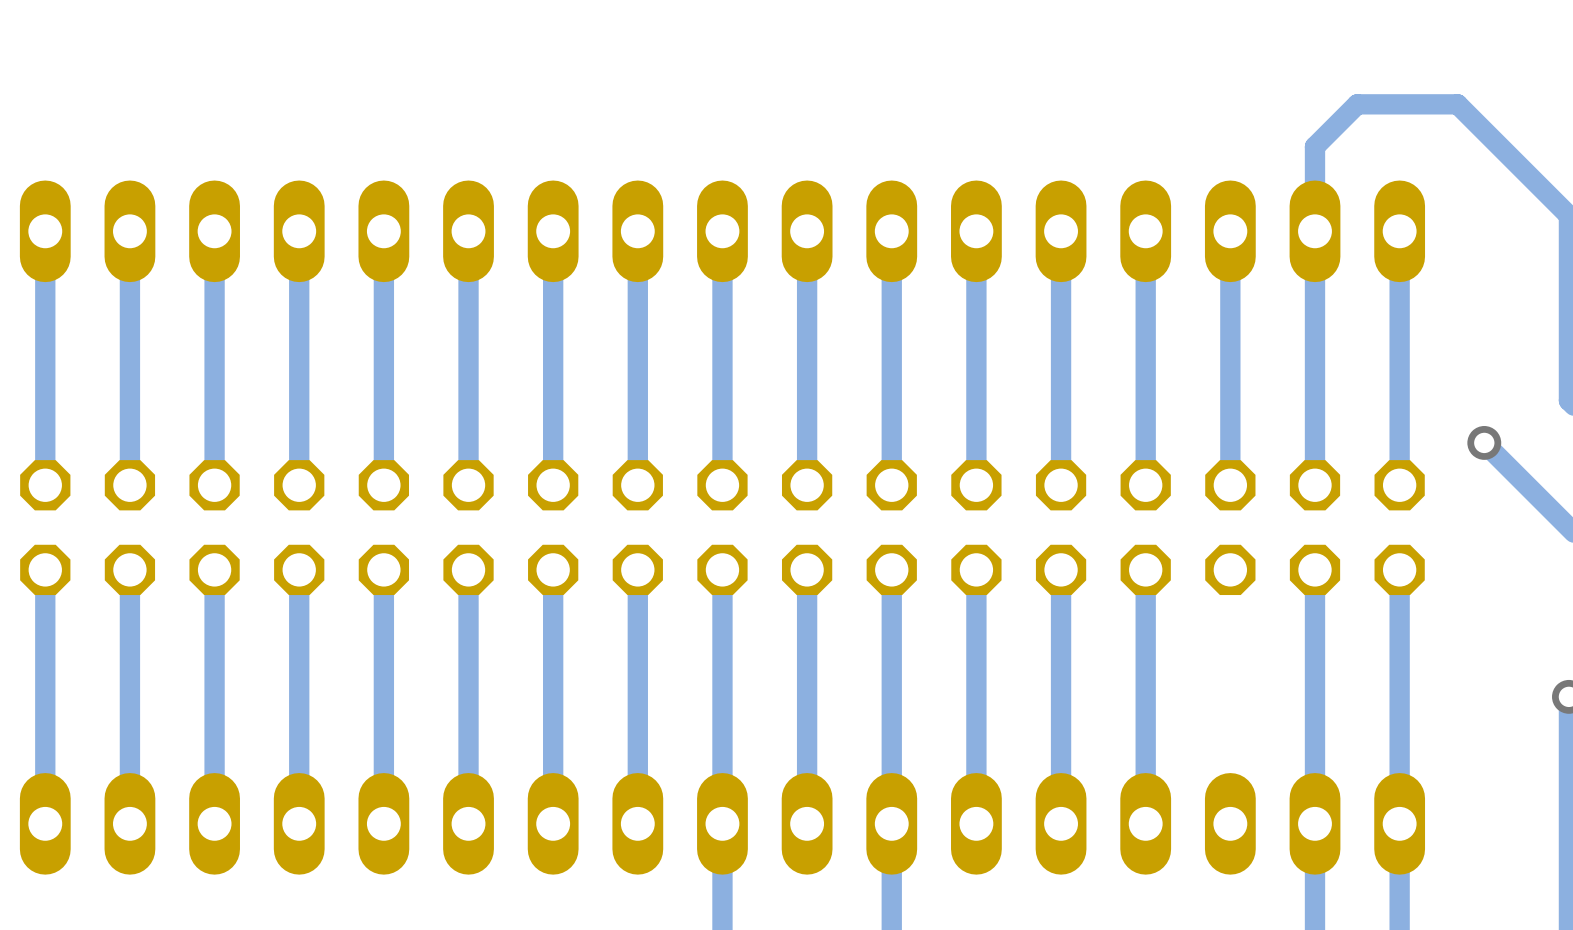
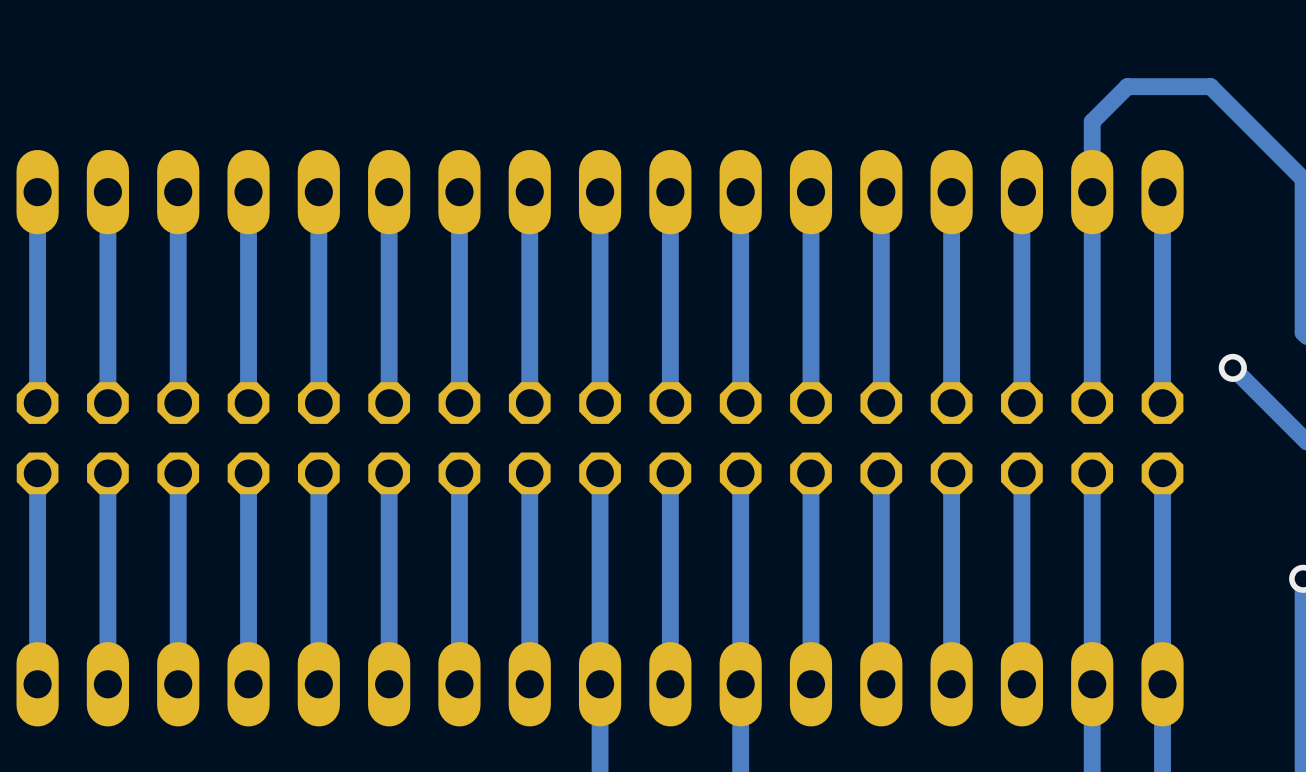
track: none -> (1021, 473) (1021, 684)

